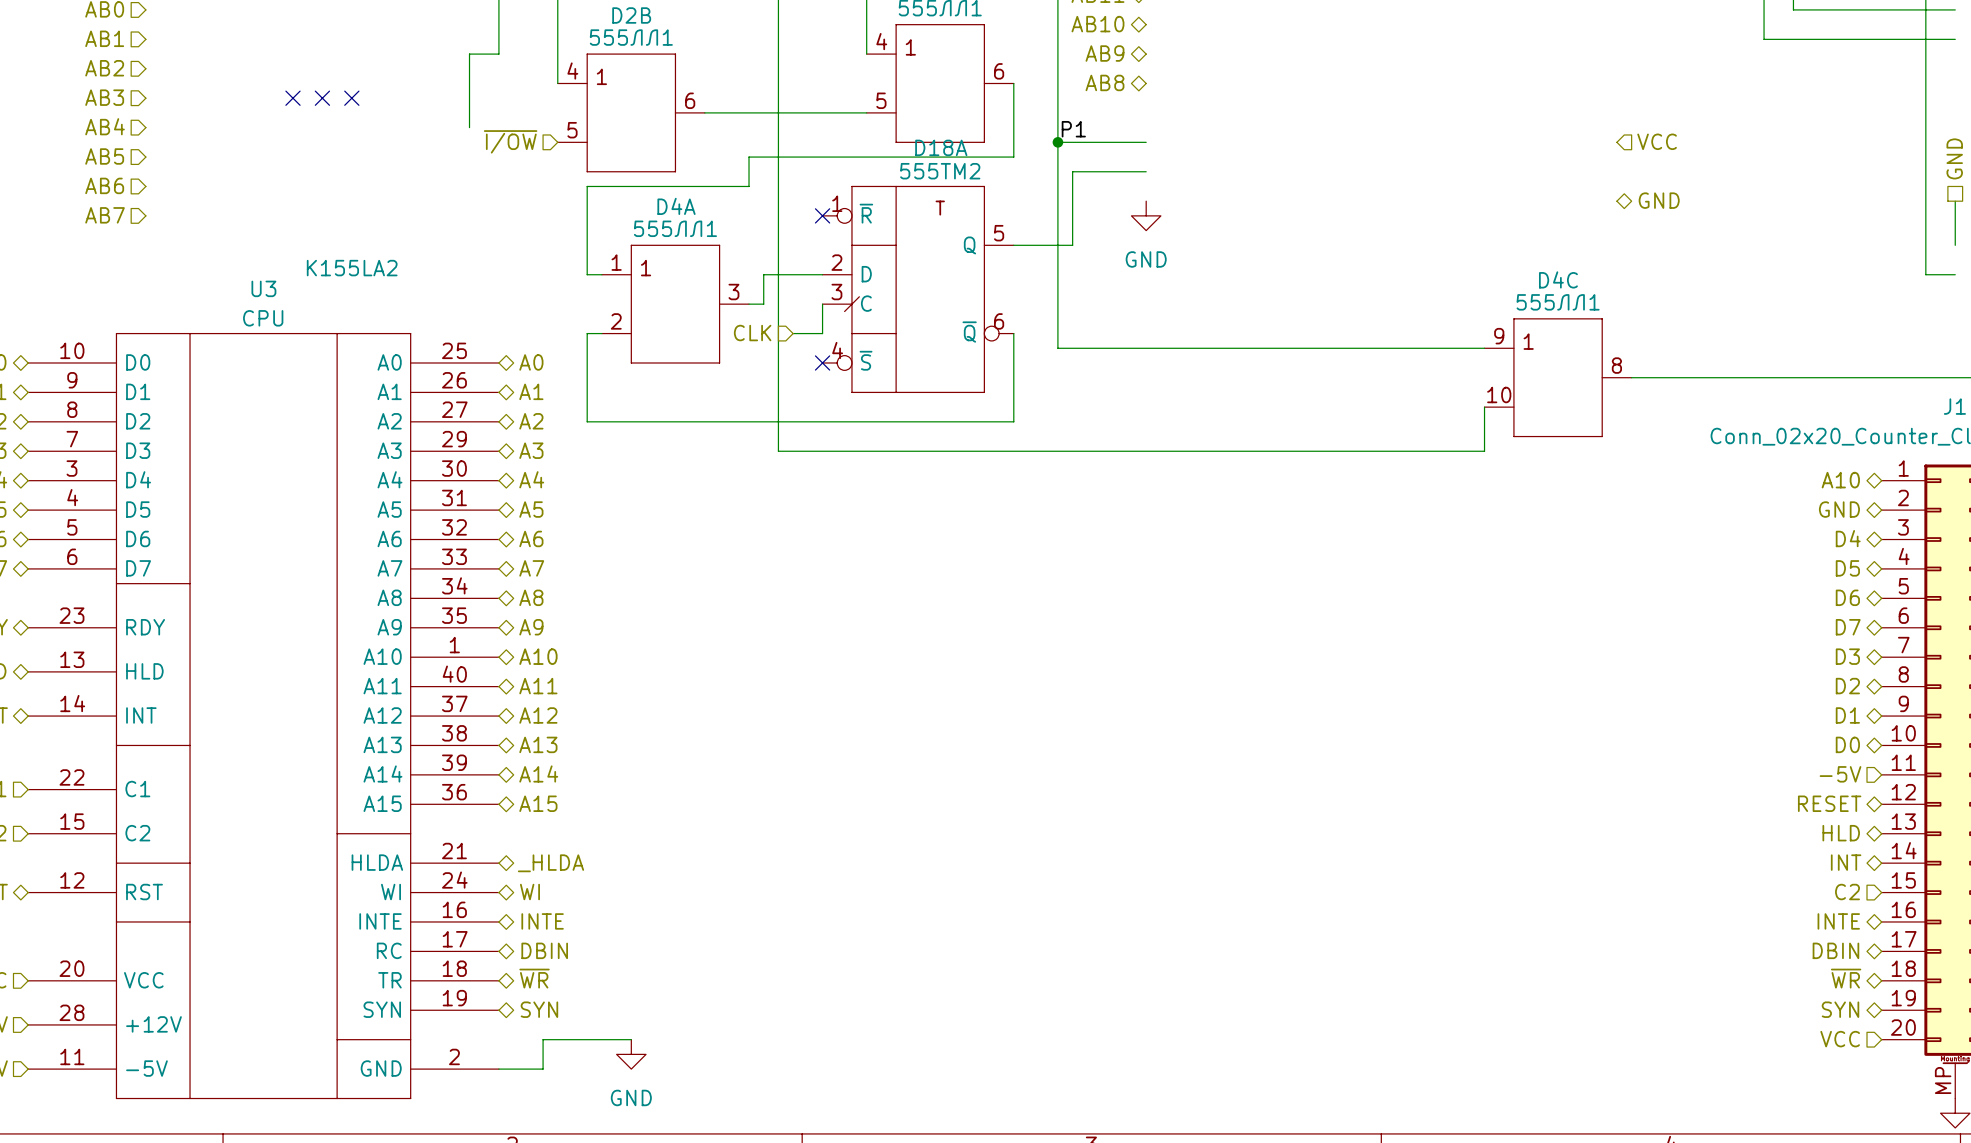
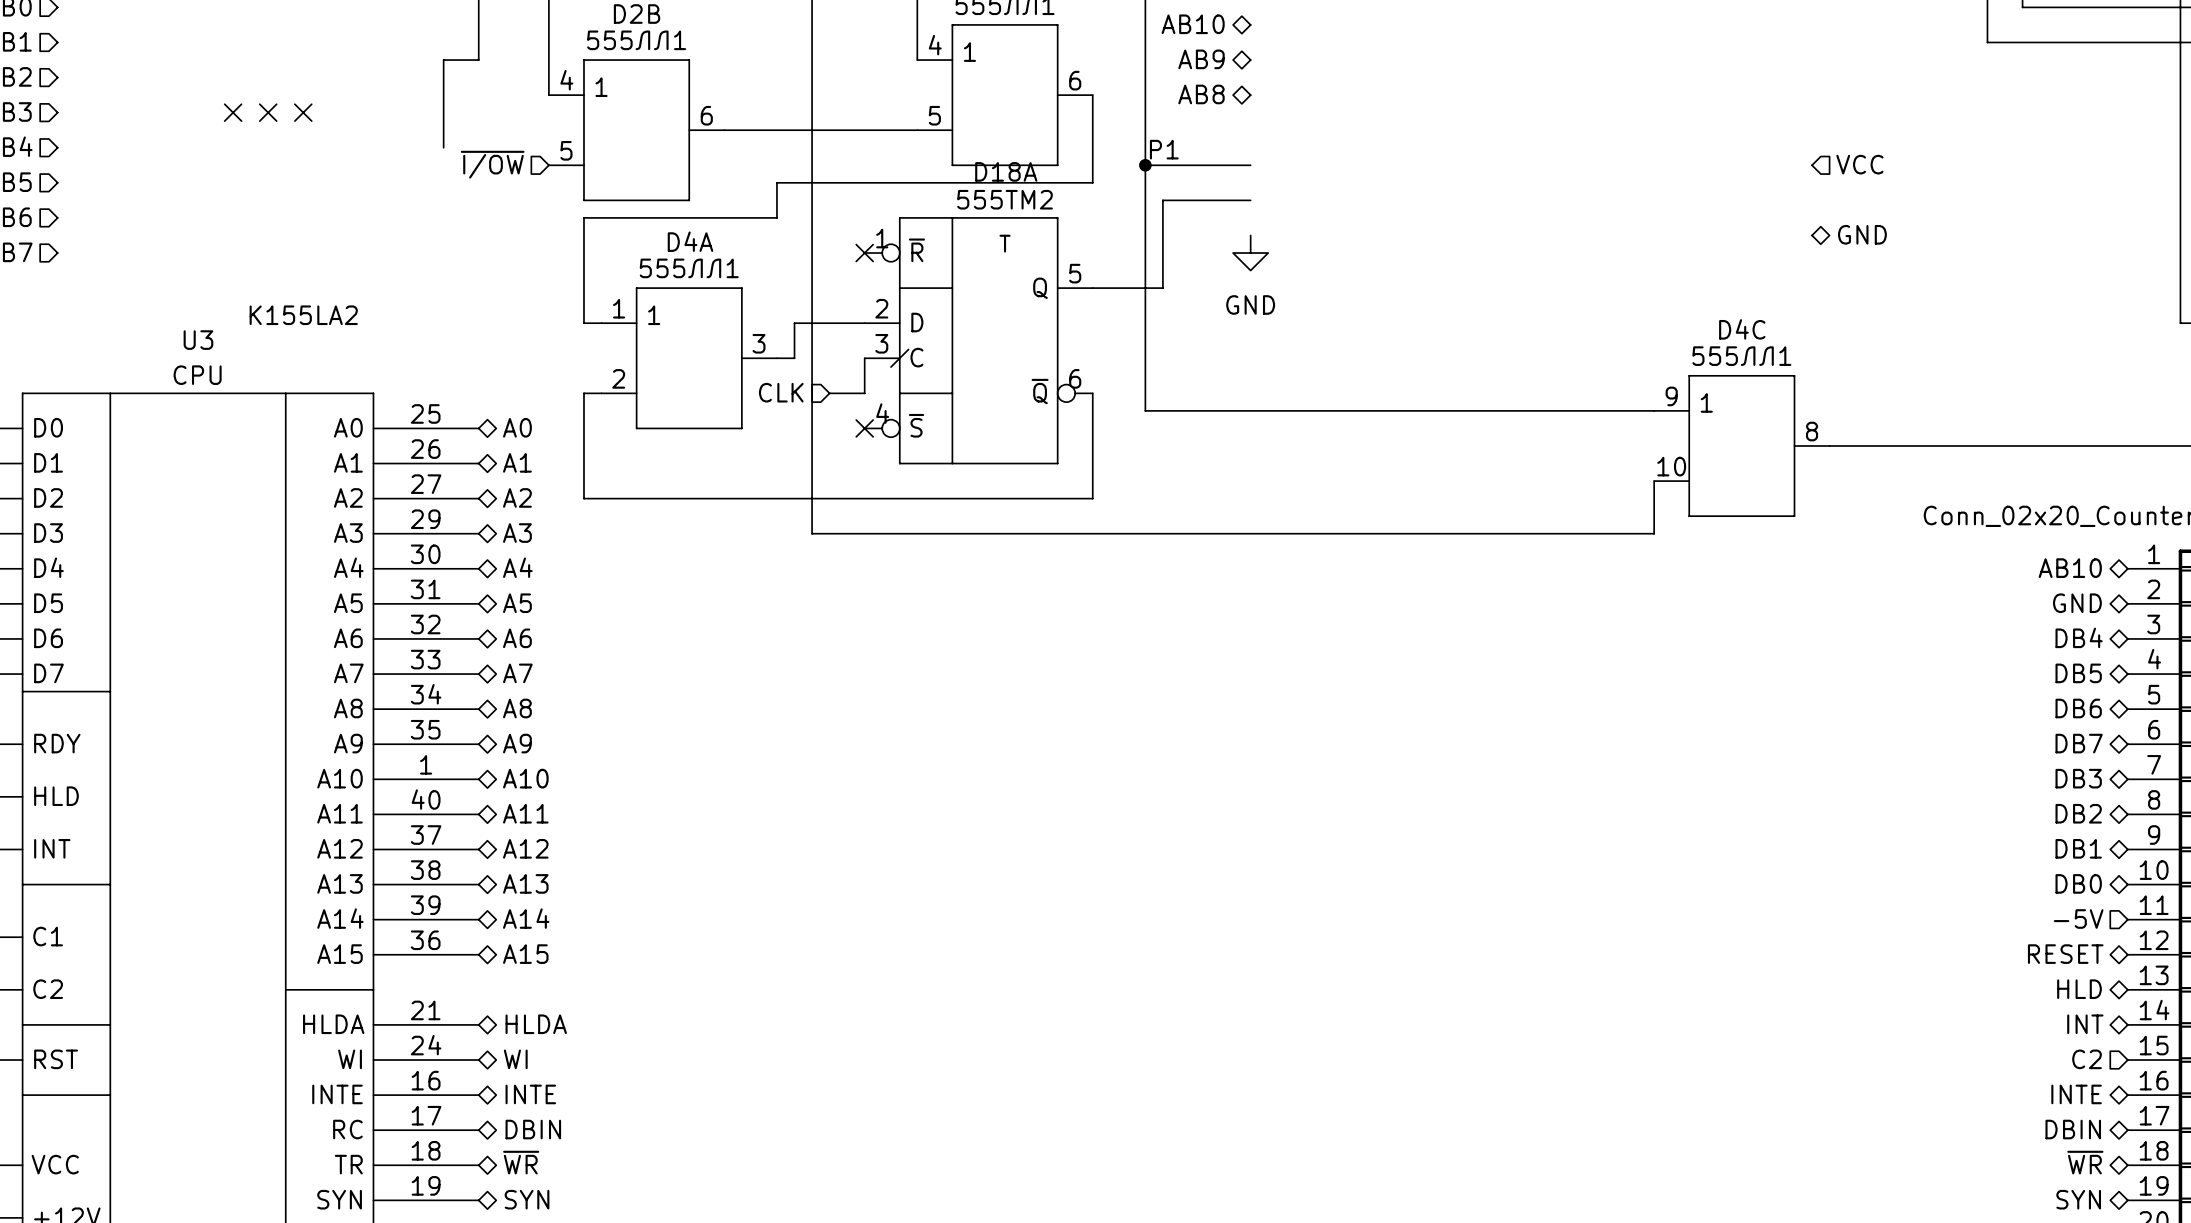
hierarchical label: A10 (1840, 480) -> AB10 (2070, 568)
hierarchical label: D4 (1848, 538) -> DB4 (2079, 637)
hierarchical label: D5 (1847, 568) -> DB5 (2078, 673)
hierarchical label: D6 (1847, 597) -> DB6 (2078, 708)
hierarchical label: D7 (1848, 627) -> DB7 (2079, 743)
hierarchical label: D3 (1847, 656) -> DB3 (2078, 778)
hierarchical label: D2 (1847, 686) -> DB2 (2078, 813)
hierarchical label: D1 (1847, 715) -> DB1 (2078, 848)
hierarchical label: D0 (1847, 744) -> DB0 (2078, 883)
hierarchical label: _HLDA (551, 863) -> HLDA (536, 1024)

